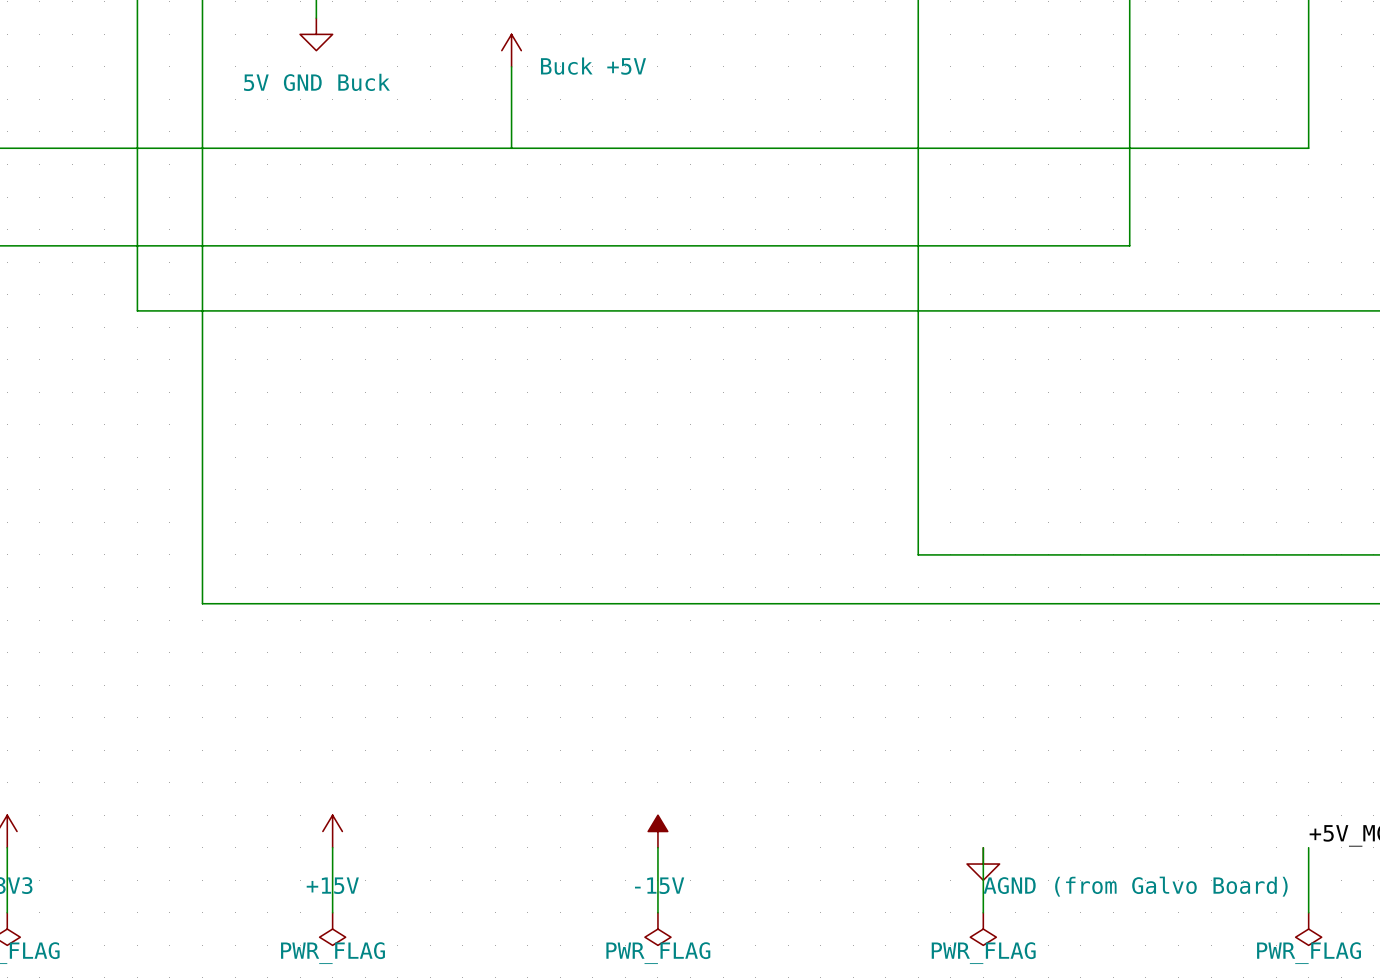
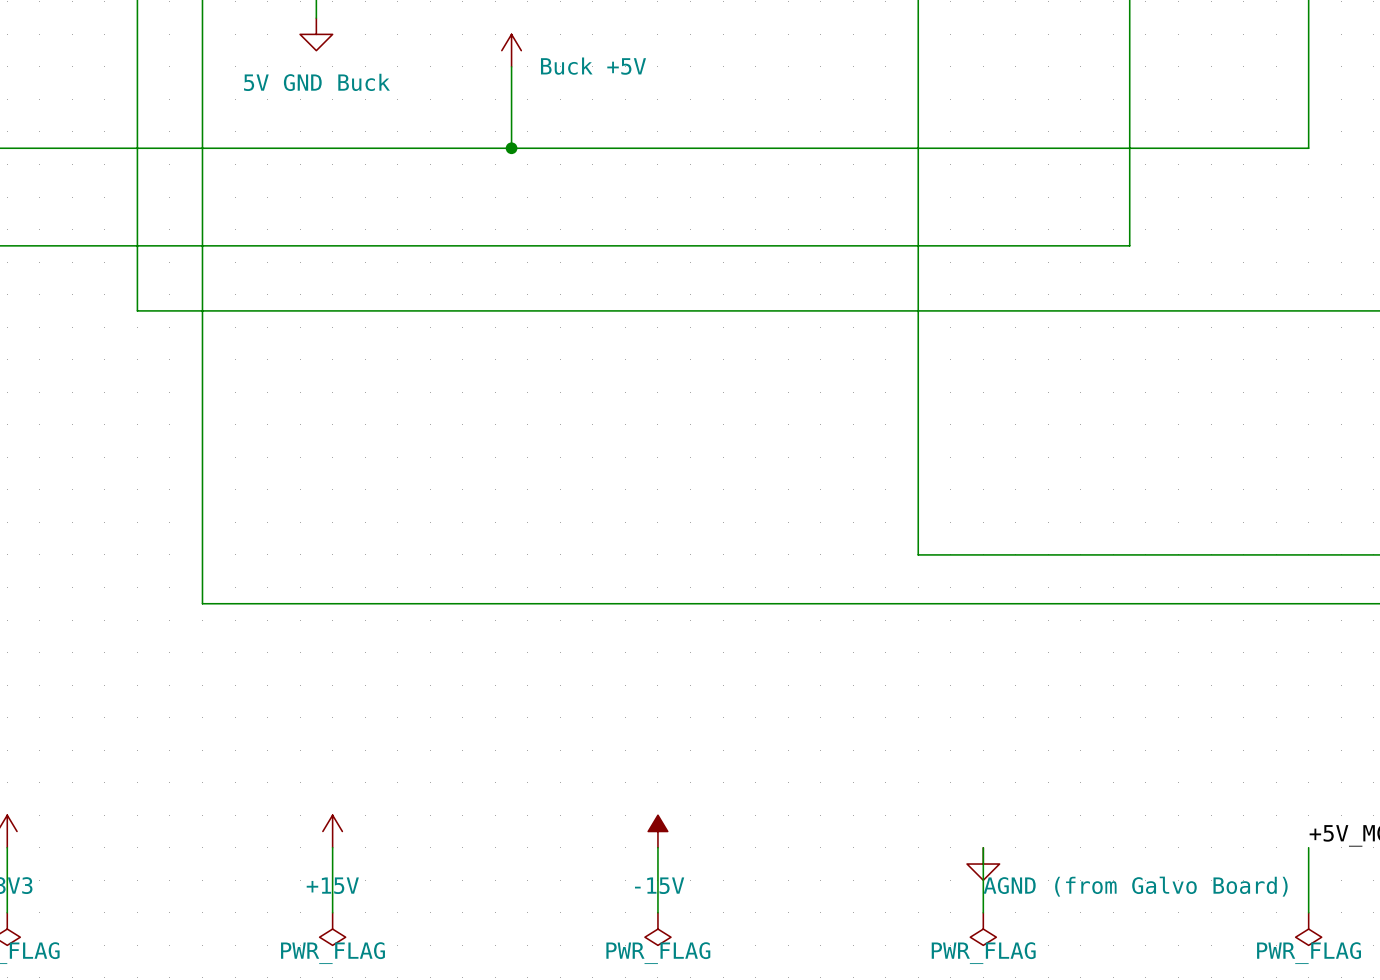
junction: none -> (511, 148)

